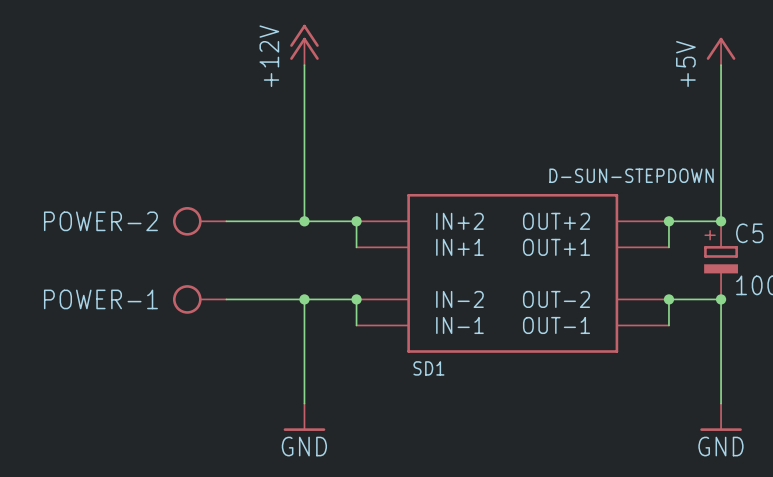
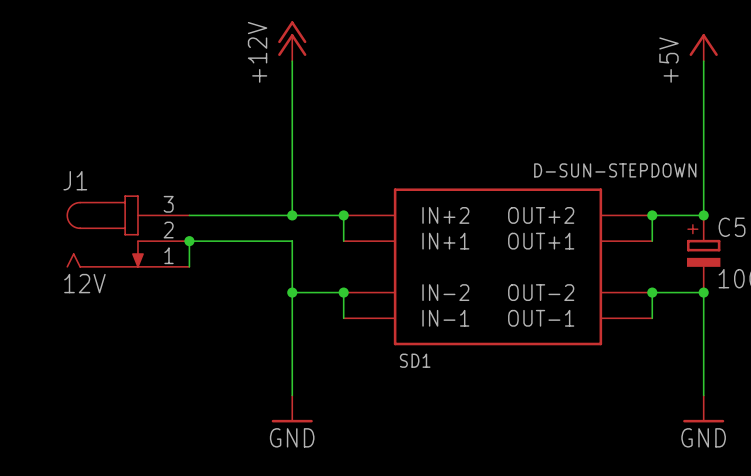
POWER-2: (199, 221) -> none
J1: none -> 12V (127, 231)
junction: none -> (189, 241)
POWER-1: (199, 299) -> none
wire: (226, 299) (304, 299) -> (189, 266) (189, 241) (292, 241) (292, 292)

